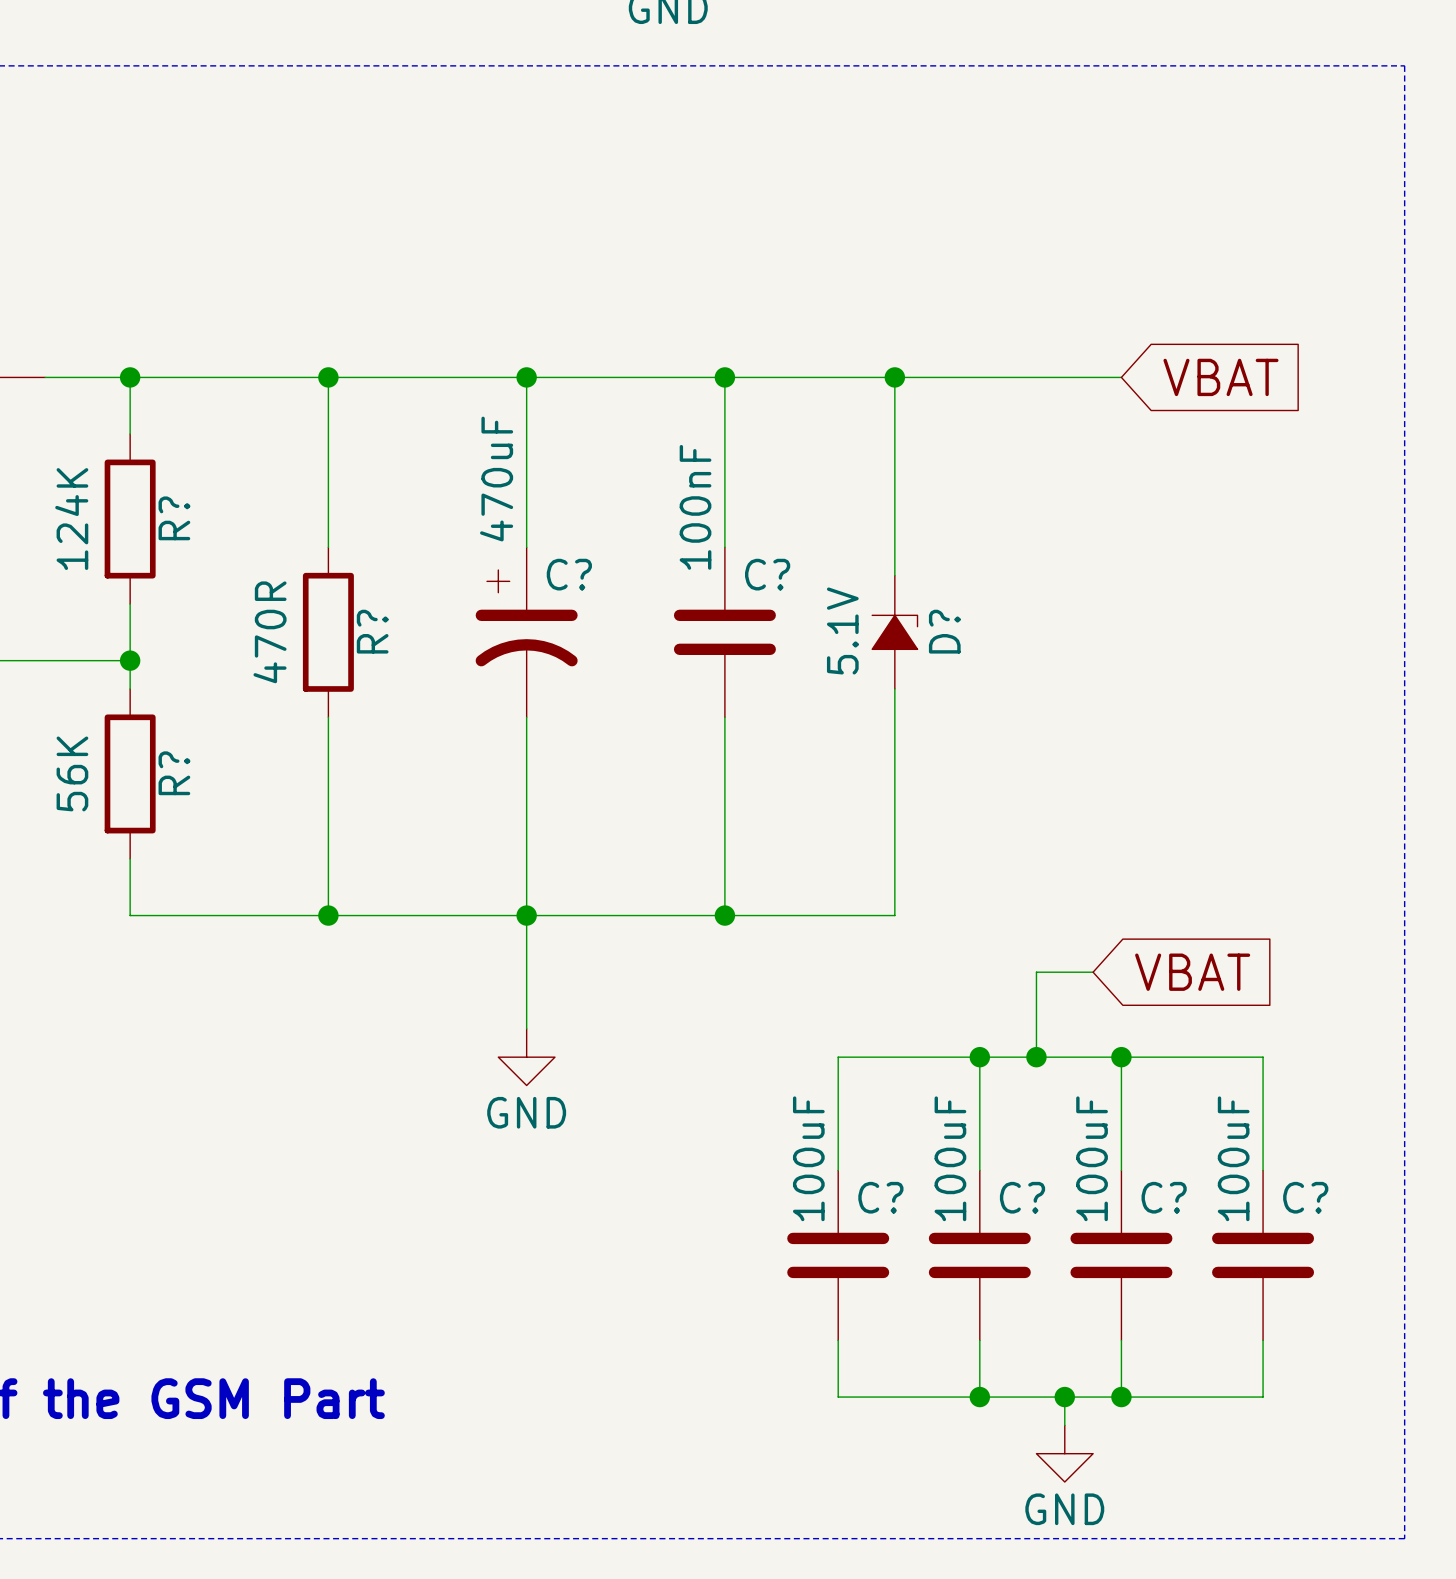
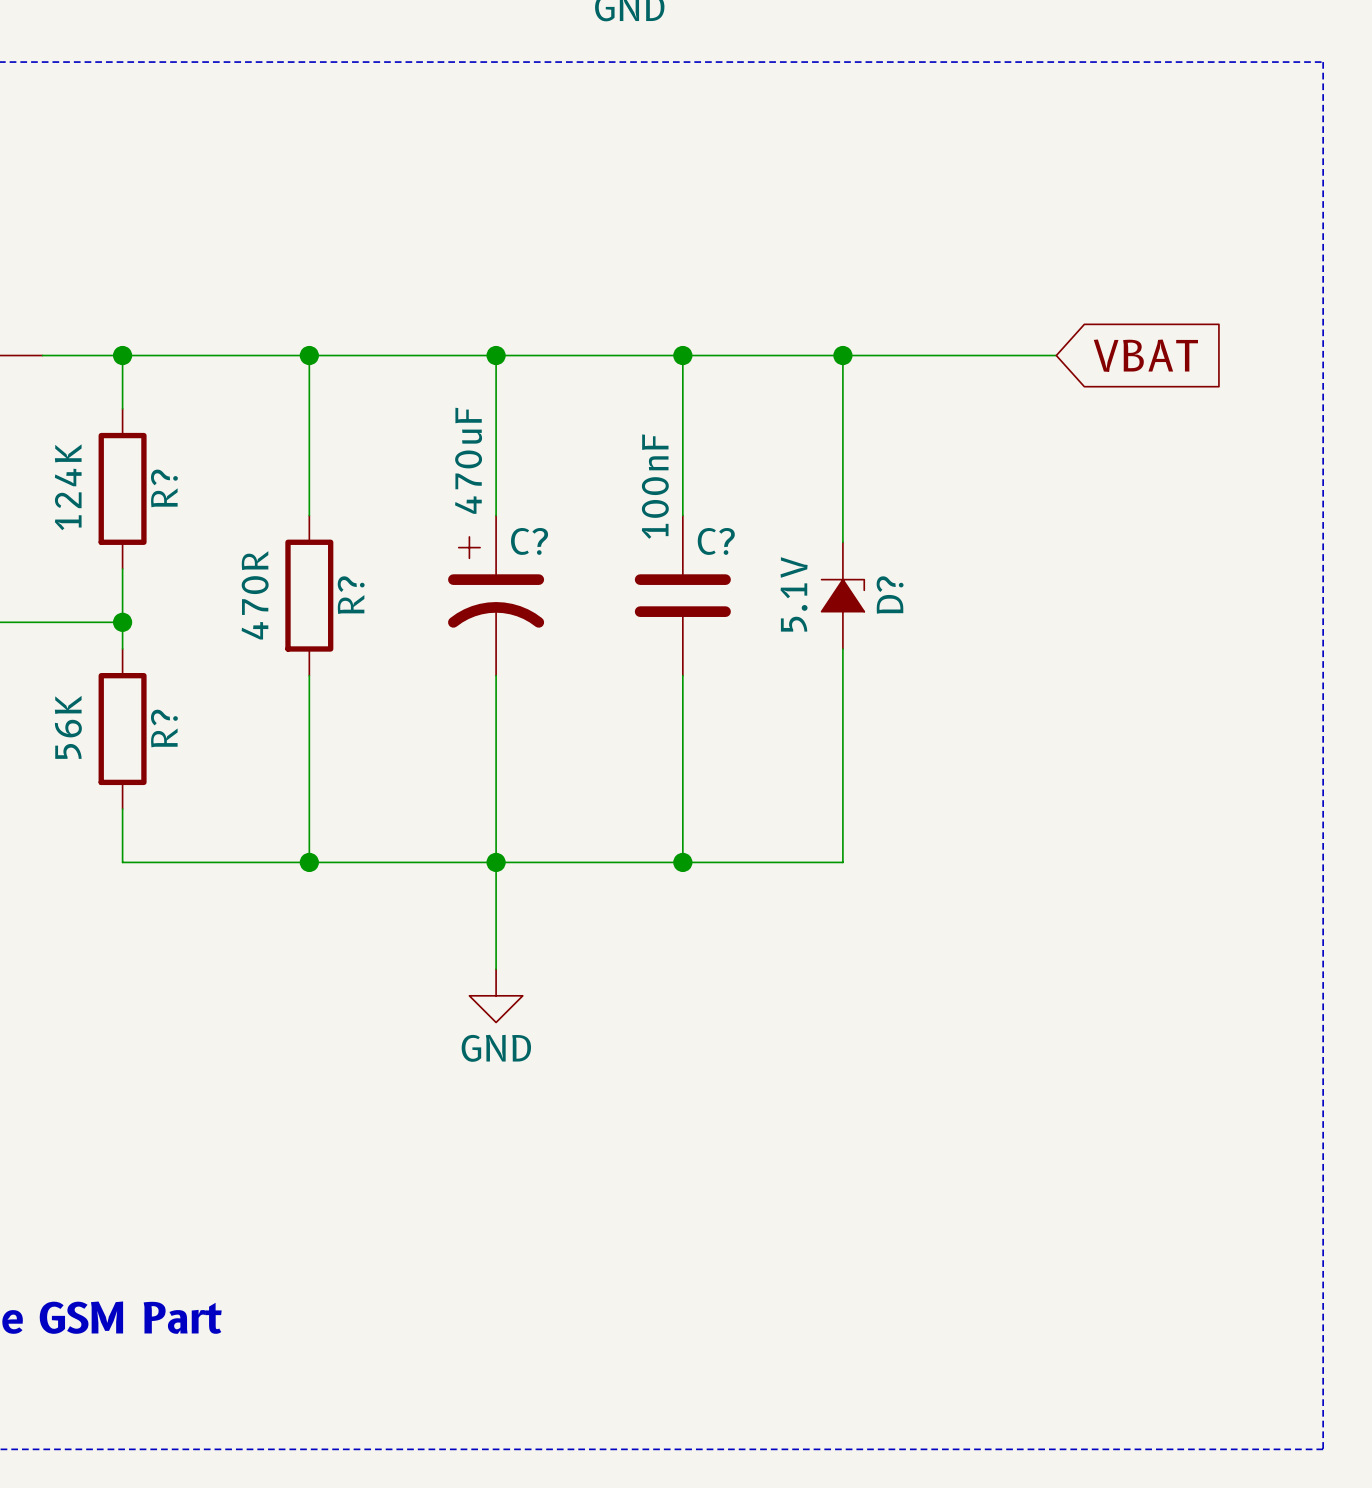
wire: (1093, 972) (1036, 972) (1036, 1057) -> none
global label: VBAT (1192, 972) -> none
wire: (979, 1057) (979, 1170) -> none
junction: (979, 1057) -> none
junction: (1036, 1057) -> none
wire: (1121, 1057) (1121, 1170) -> none
junction: (1121, 1057) -> none
wire: (838, 1170) (838, 1057) (1263, 1057) (1263, 1170) -> none
C?: 100uF (838, 1255) -> none
C?: 100uF (979, 1255) -> none
C?: 100uF (1121, 1255) -> none
C?: 100uF (1263, 1255) -> none
wire: (838, 1340) (838, 1397) (1263, 1397) (1263, 1340) -> none
wire: (979, 1340) (979, 1397) -> none
wire: (1121, 1340) (1121, 1397) -> none
junction: (979, 1397) -> none
wire: (1064, 1397) (1064, 1425) -> none
junction: (1064, 1397) -> none
junction: (1121, 1397) -> none
power symbol: GND (1064, 1453) -> none

